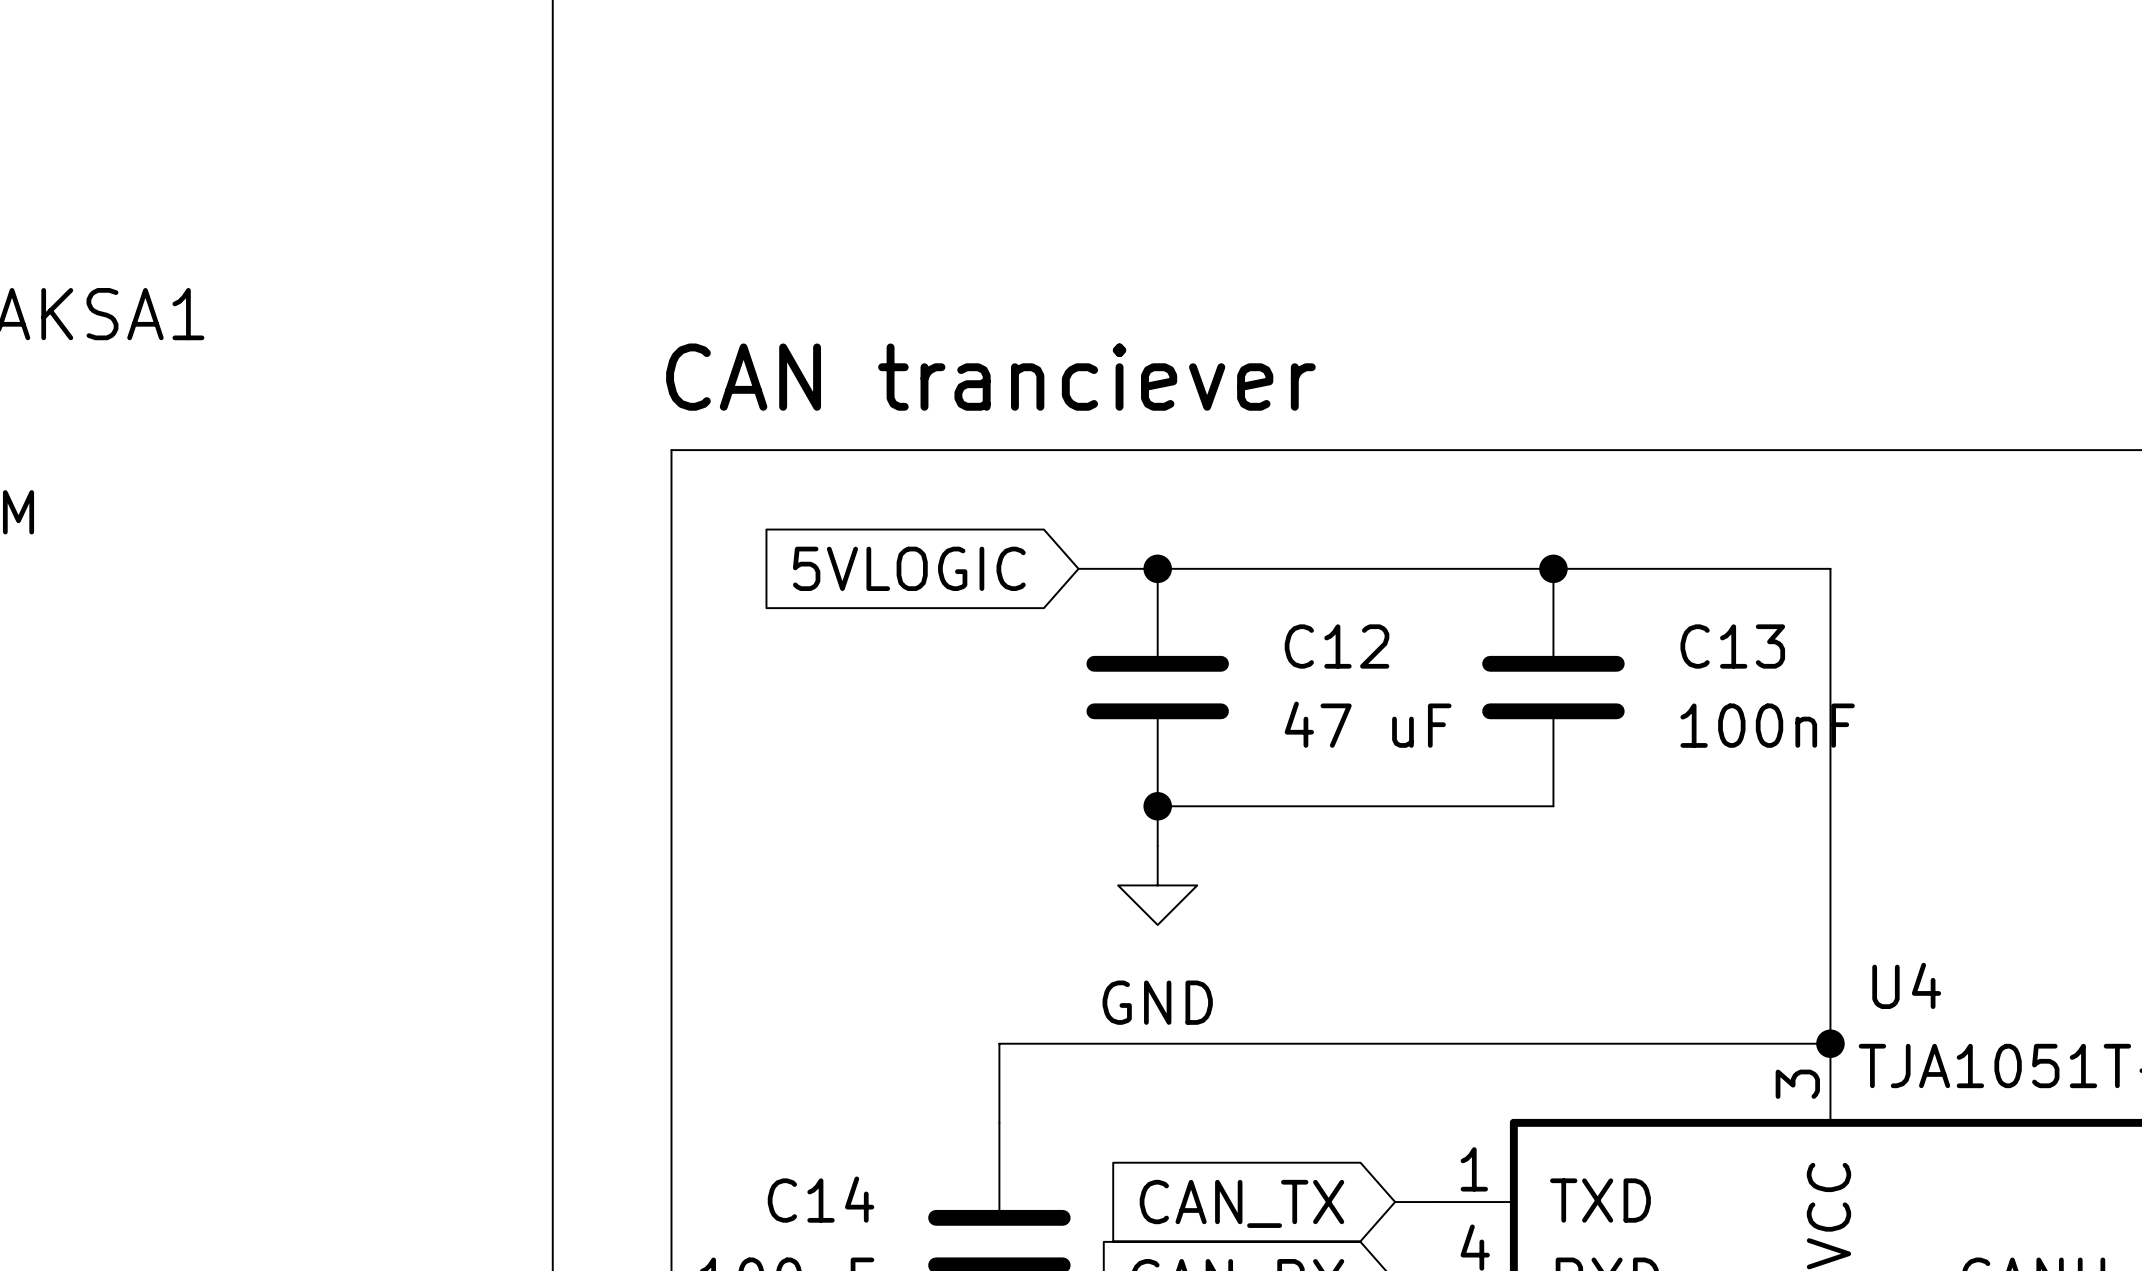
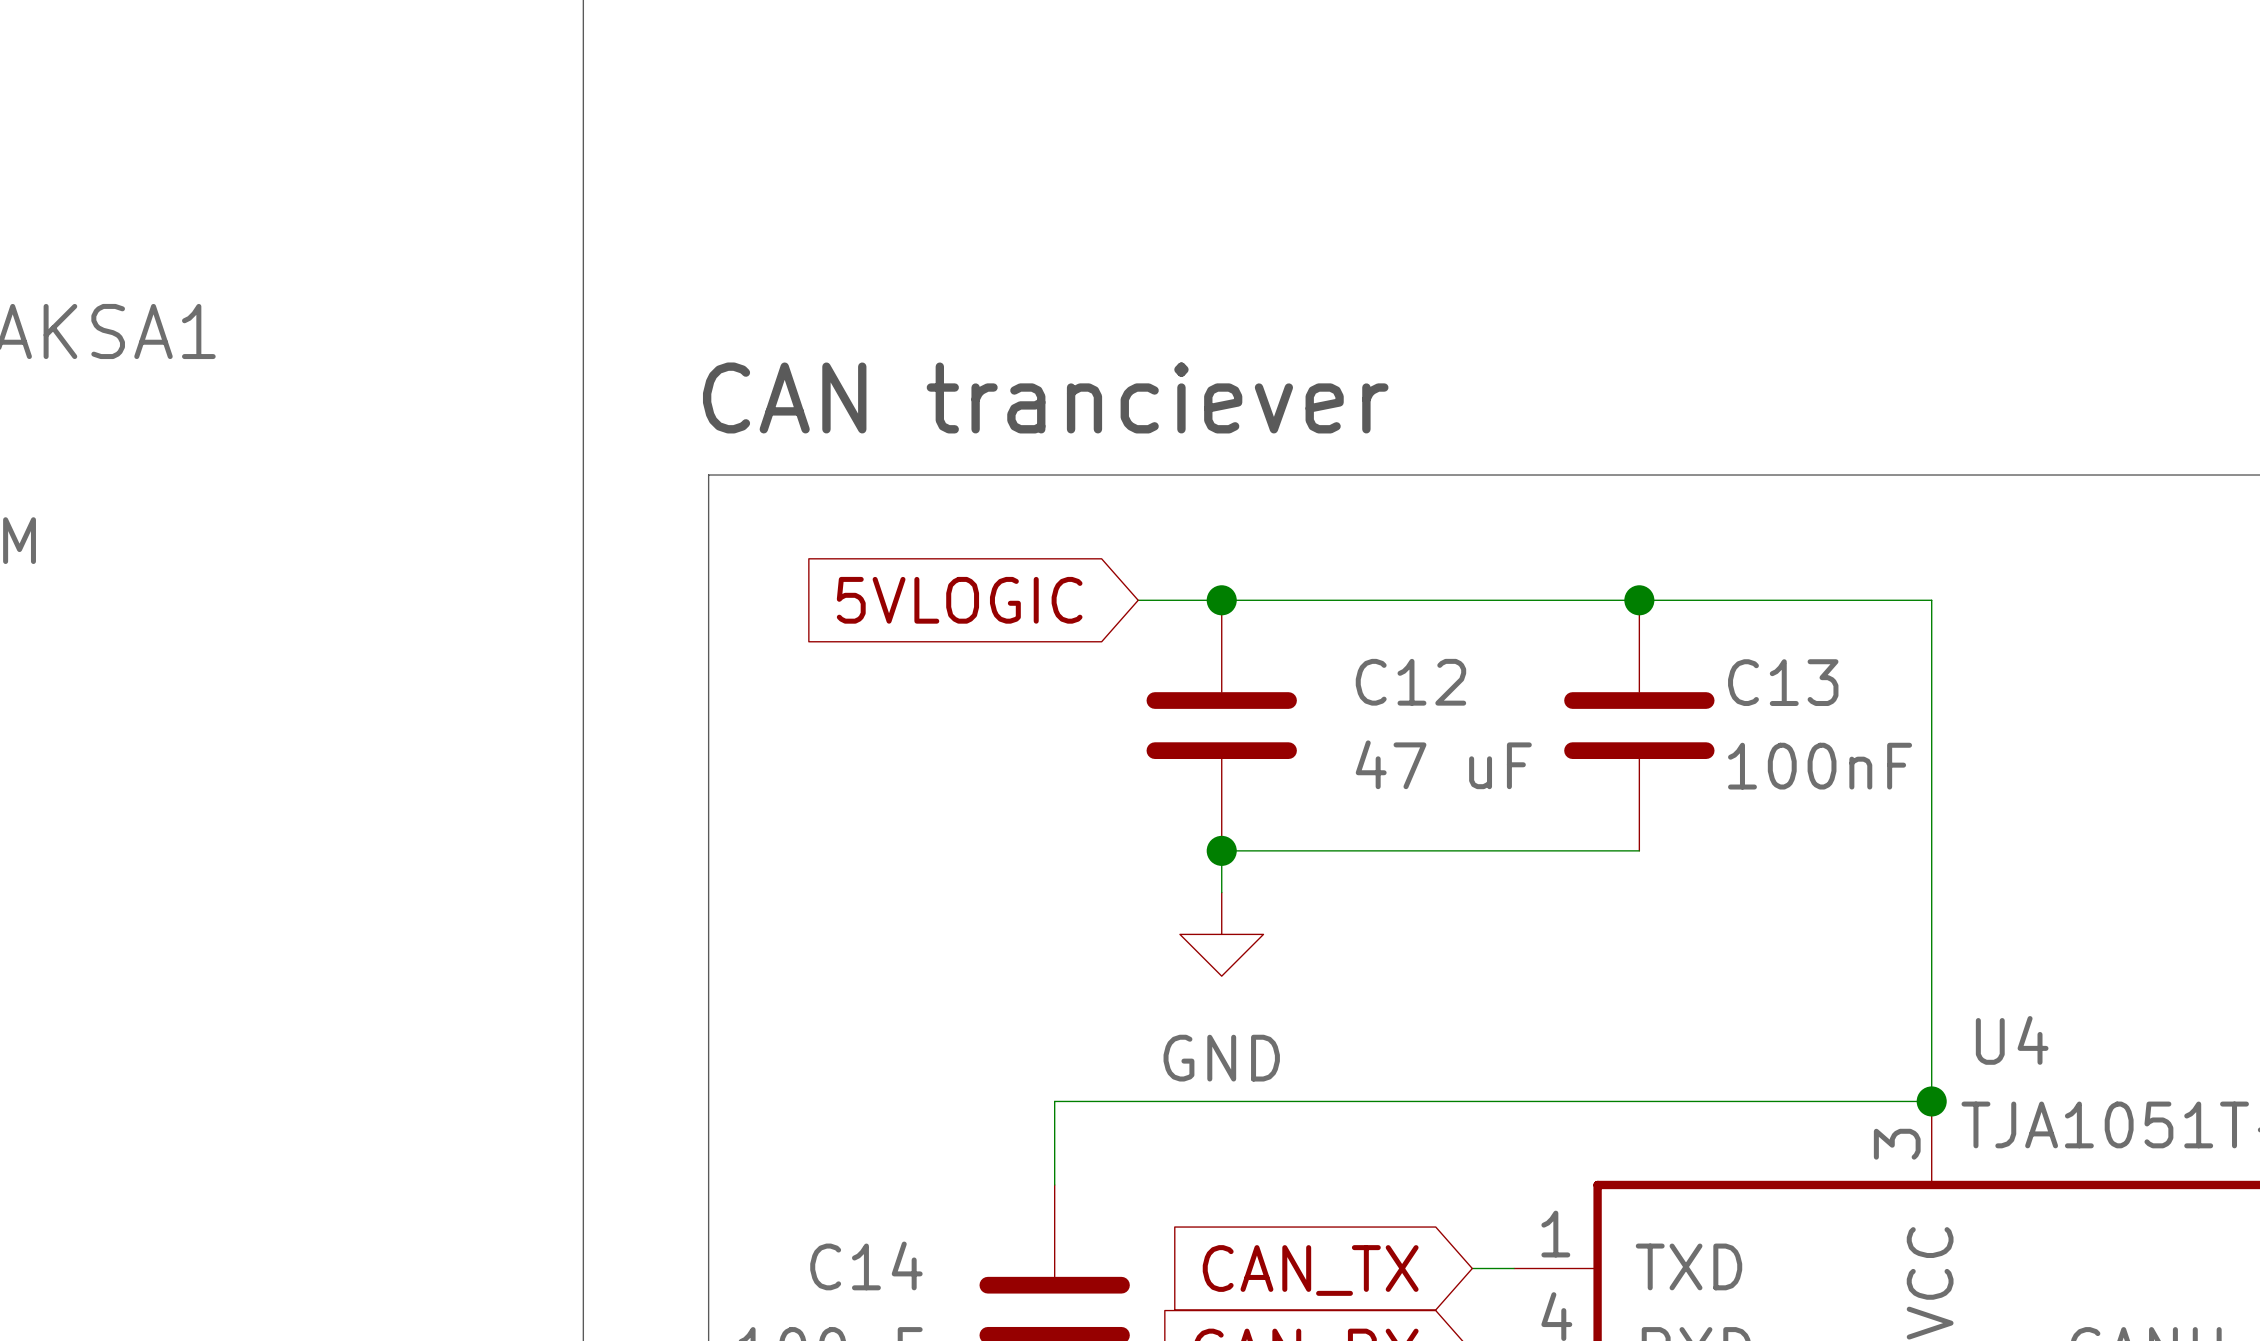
C13 name position: C13 (1732, 646) -> C13 (1783, 682)
C13 value position: 100nF (1767, 725) -> 100nF (1820, 766)

